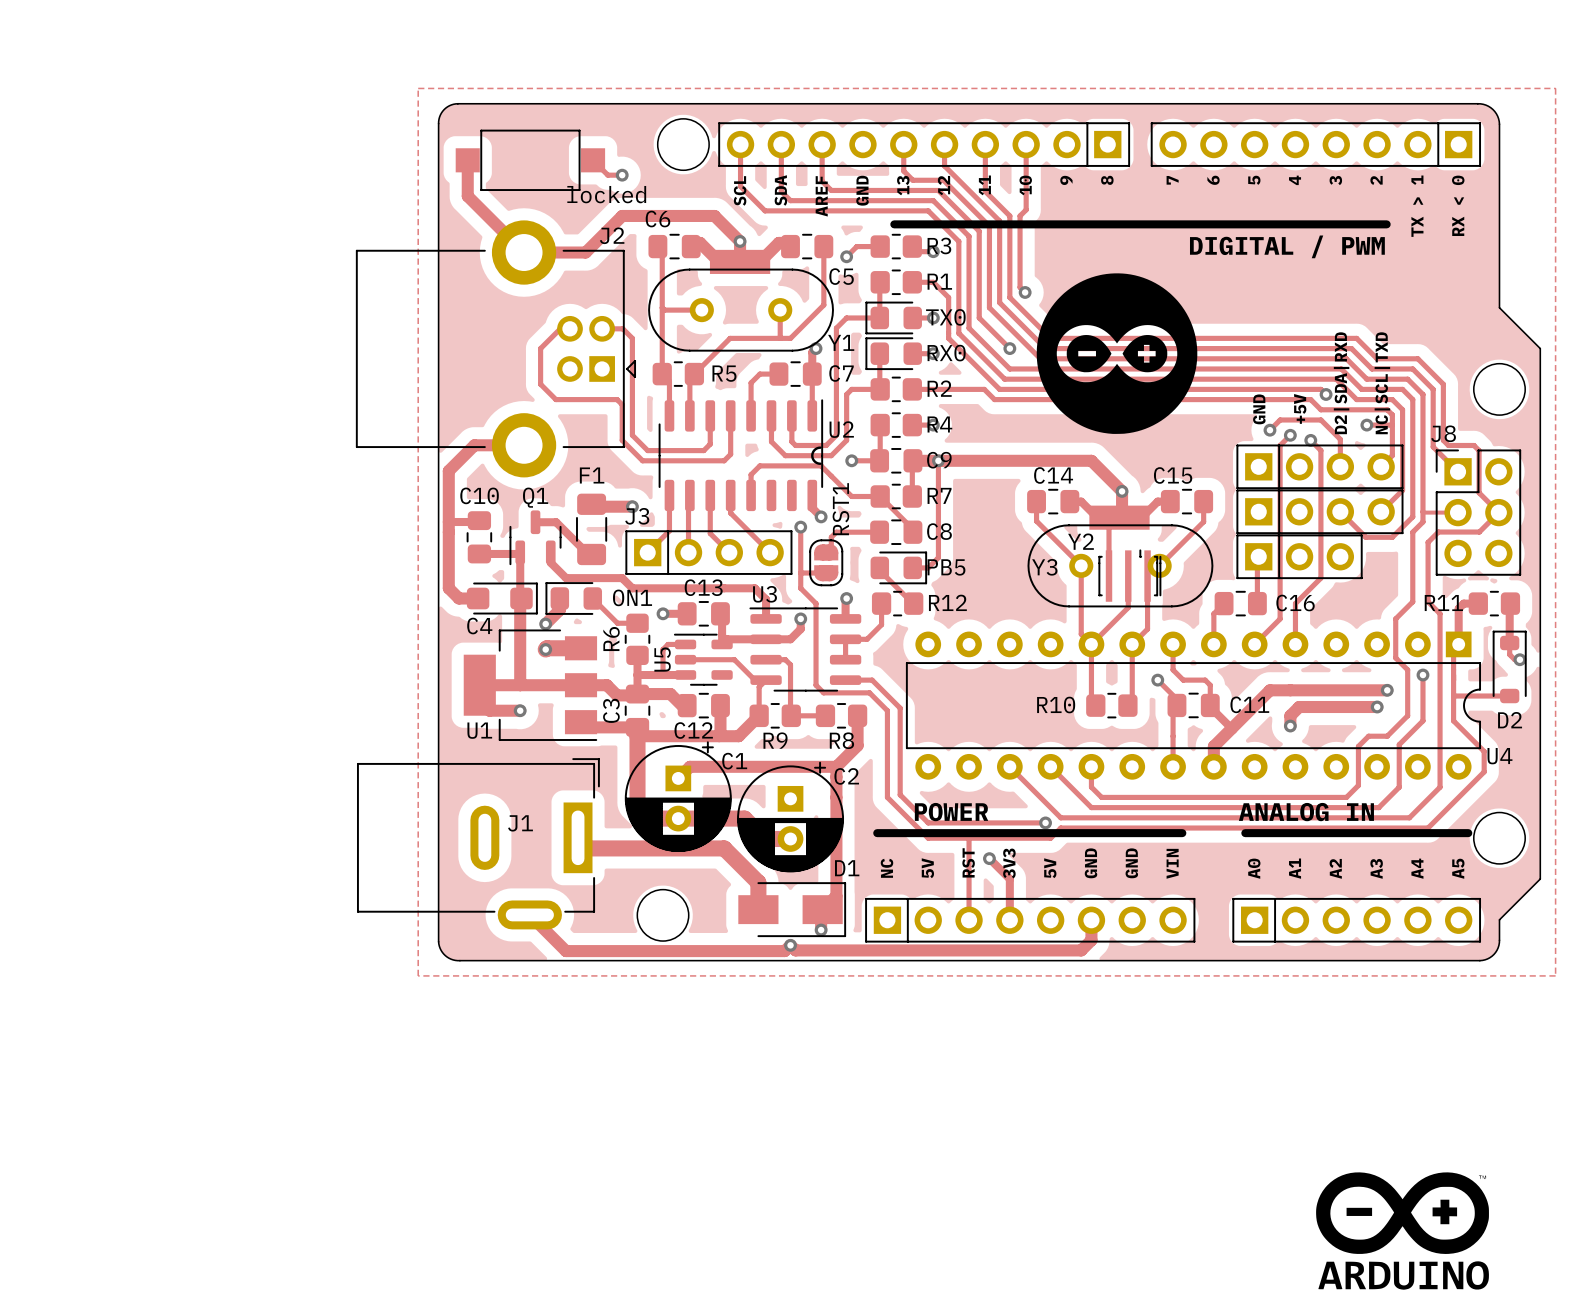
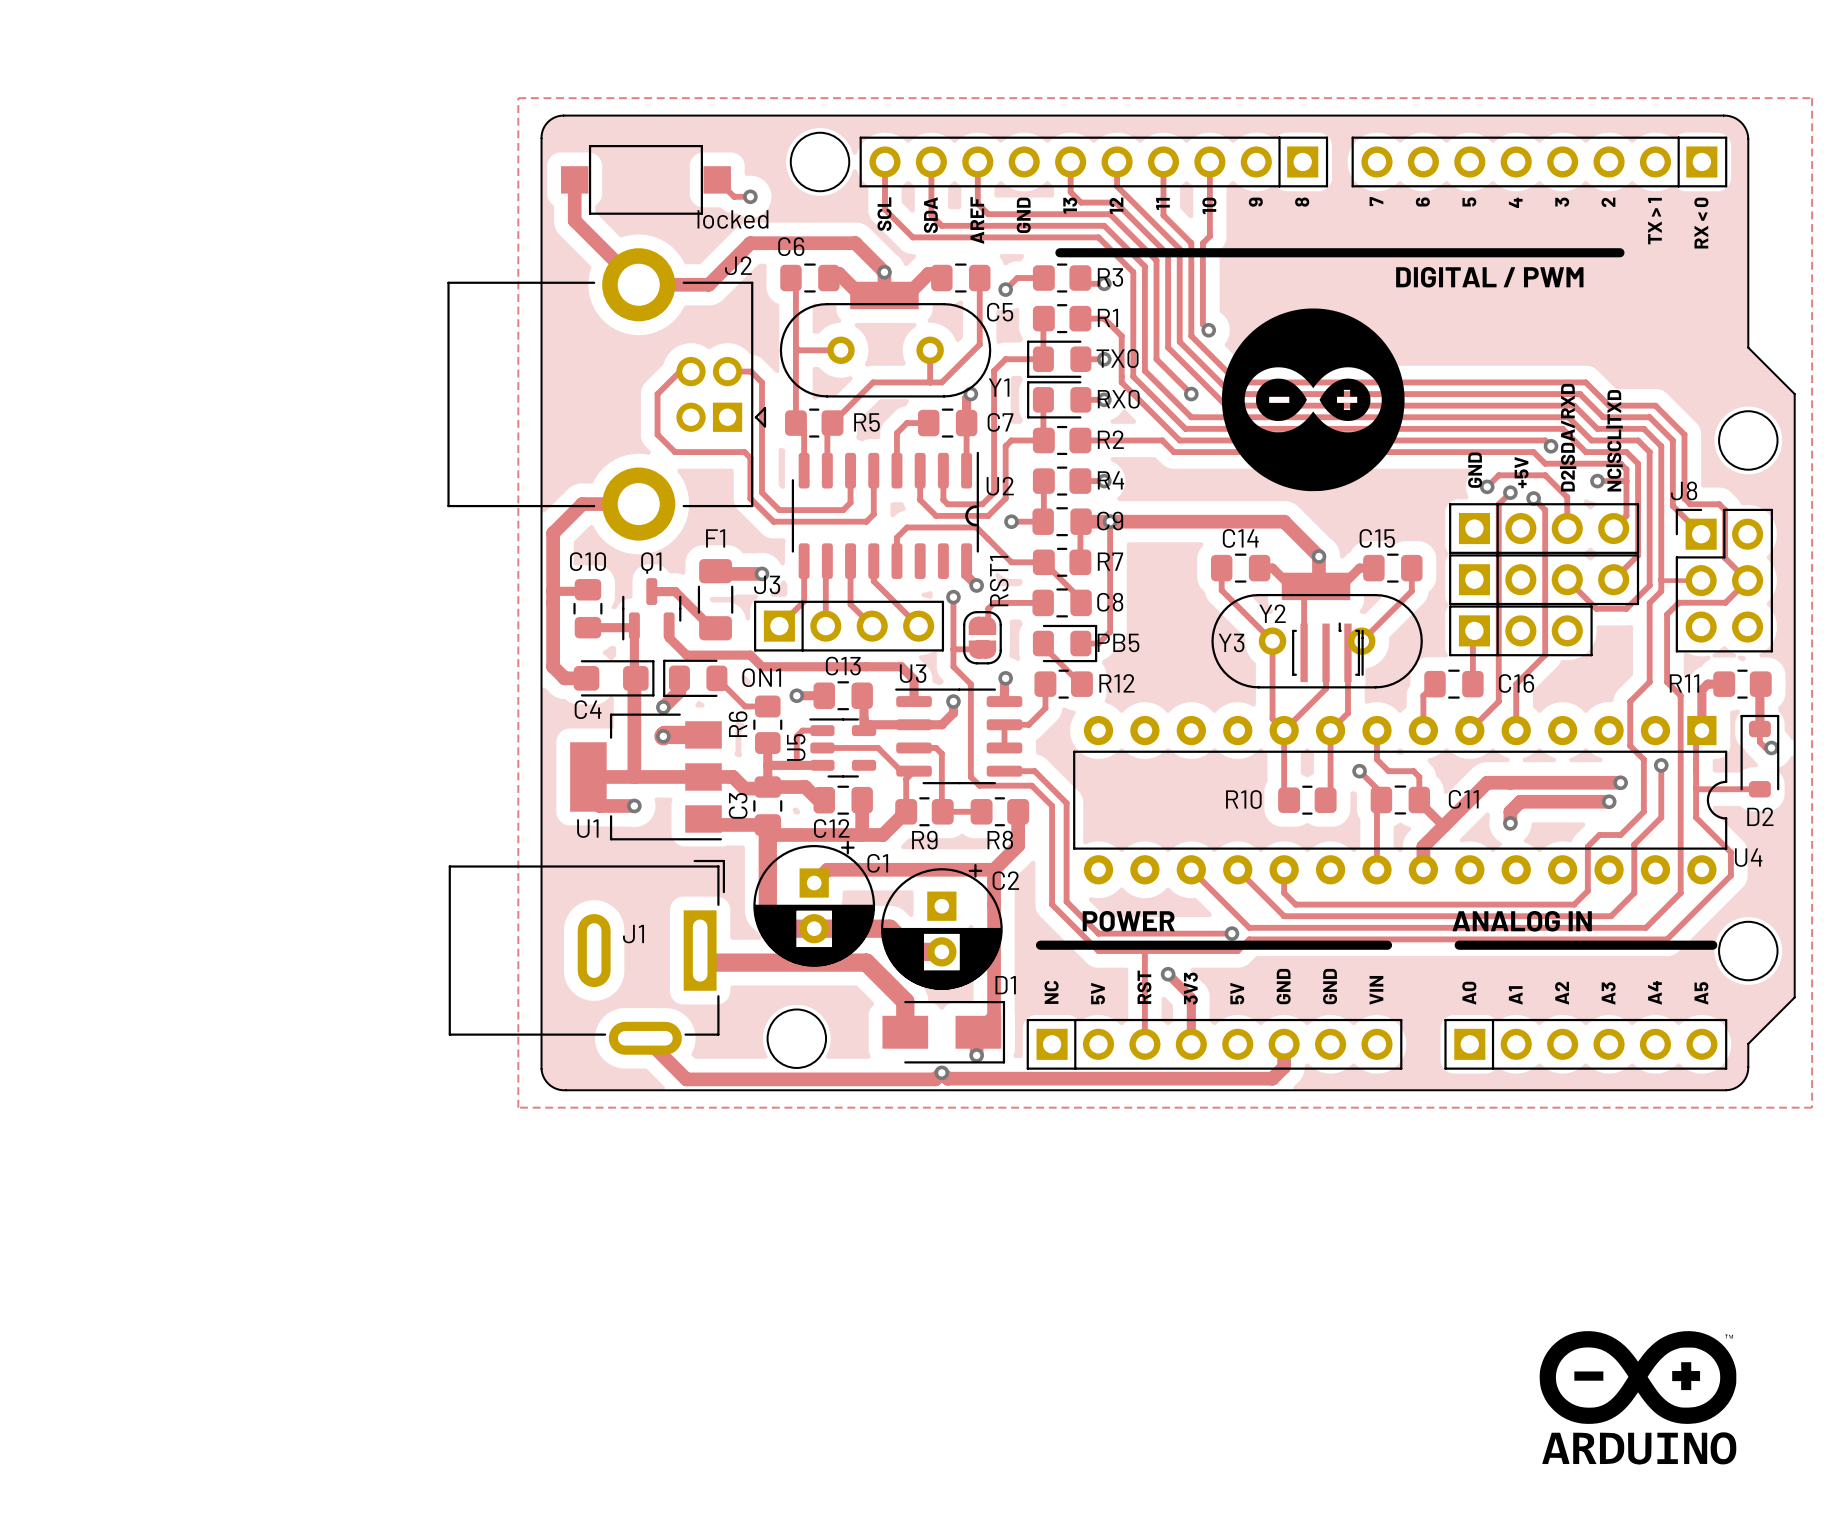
text: D2|SDA|RXD (1341, 383) -> D2|SDA/RXD (1568, 437)

